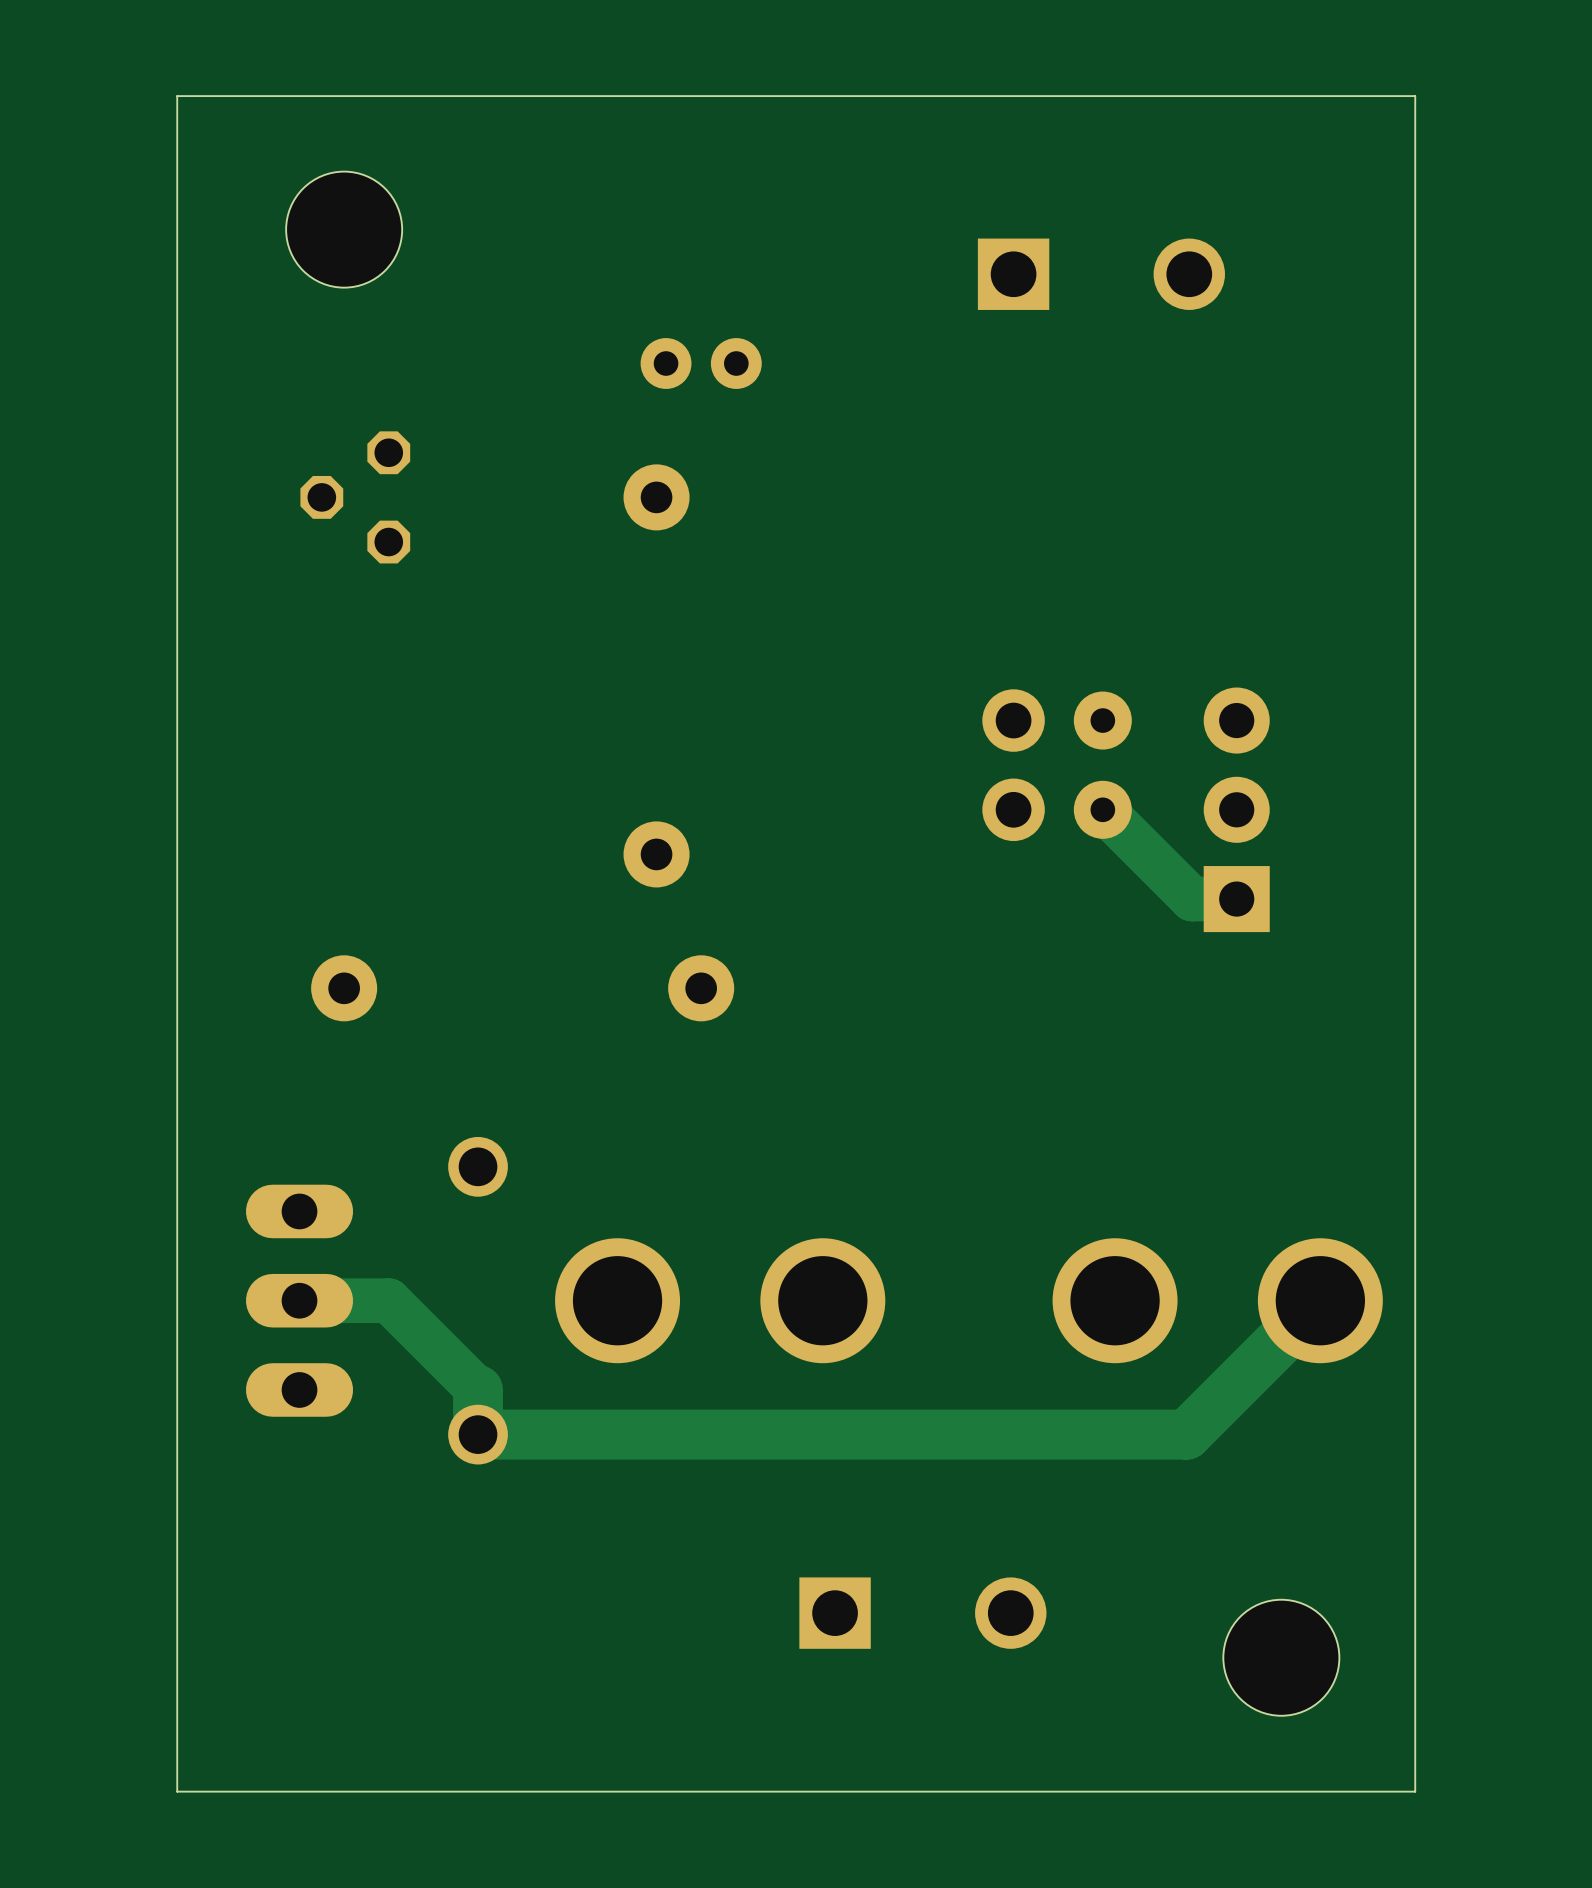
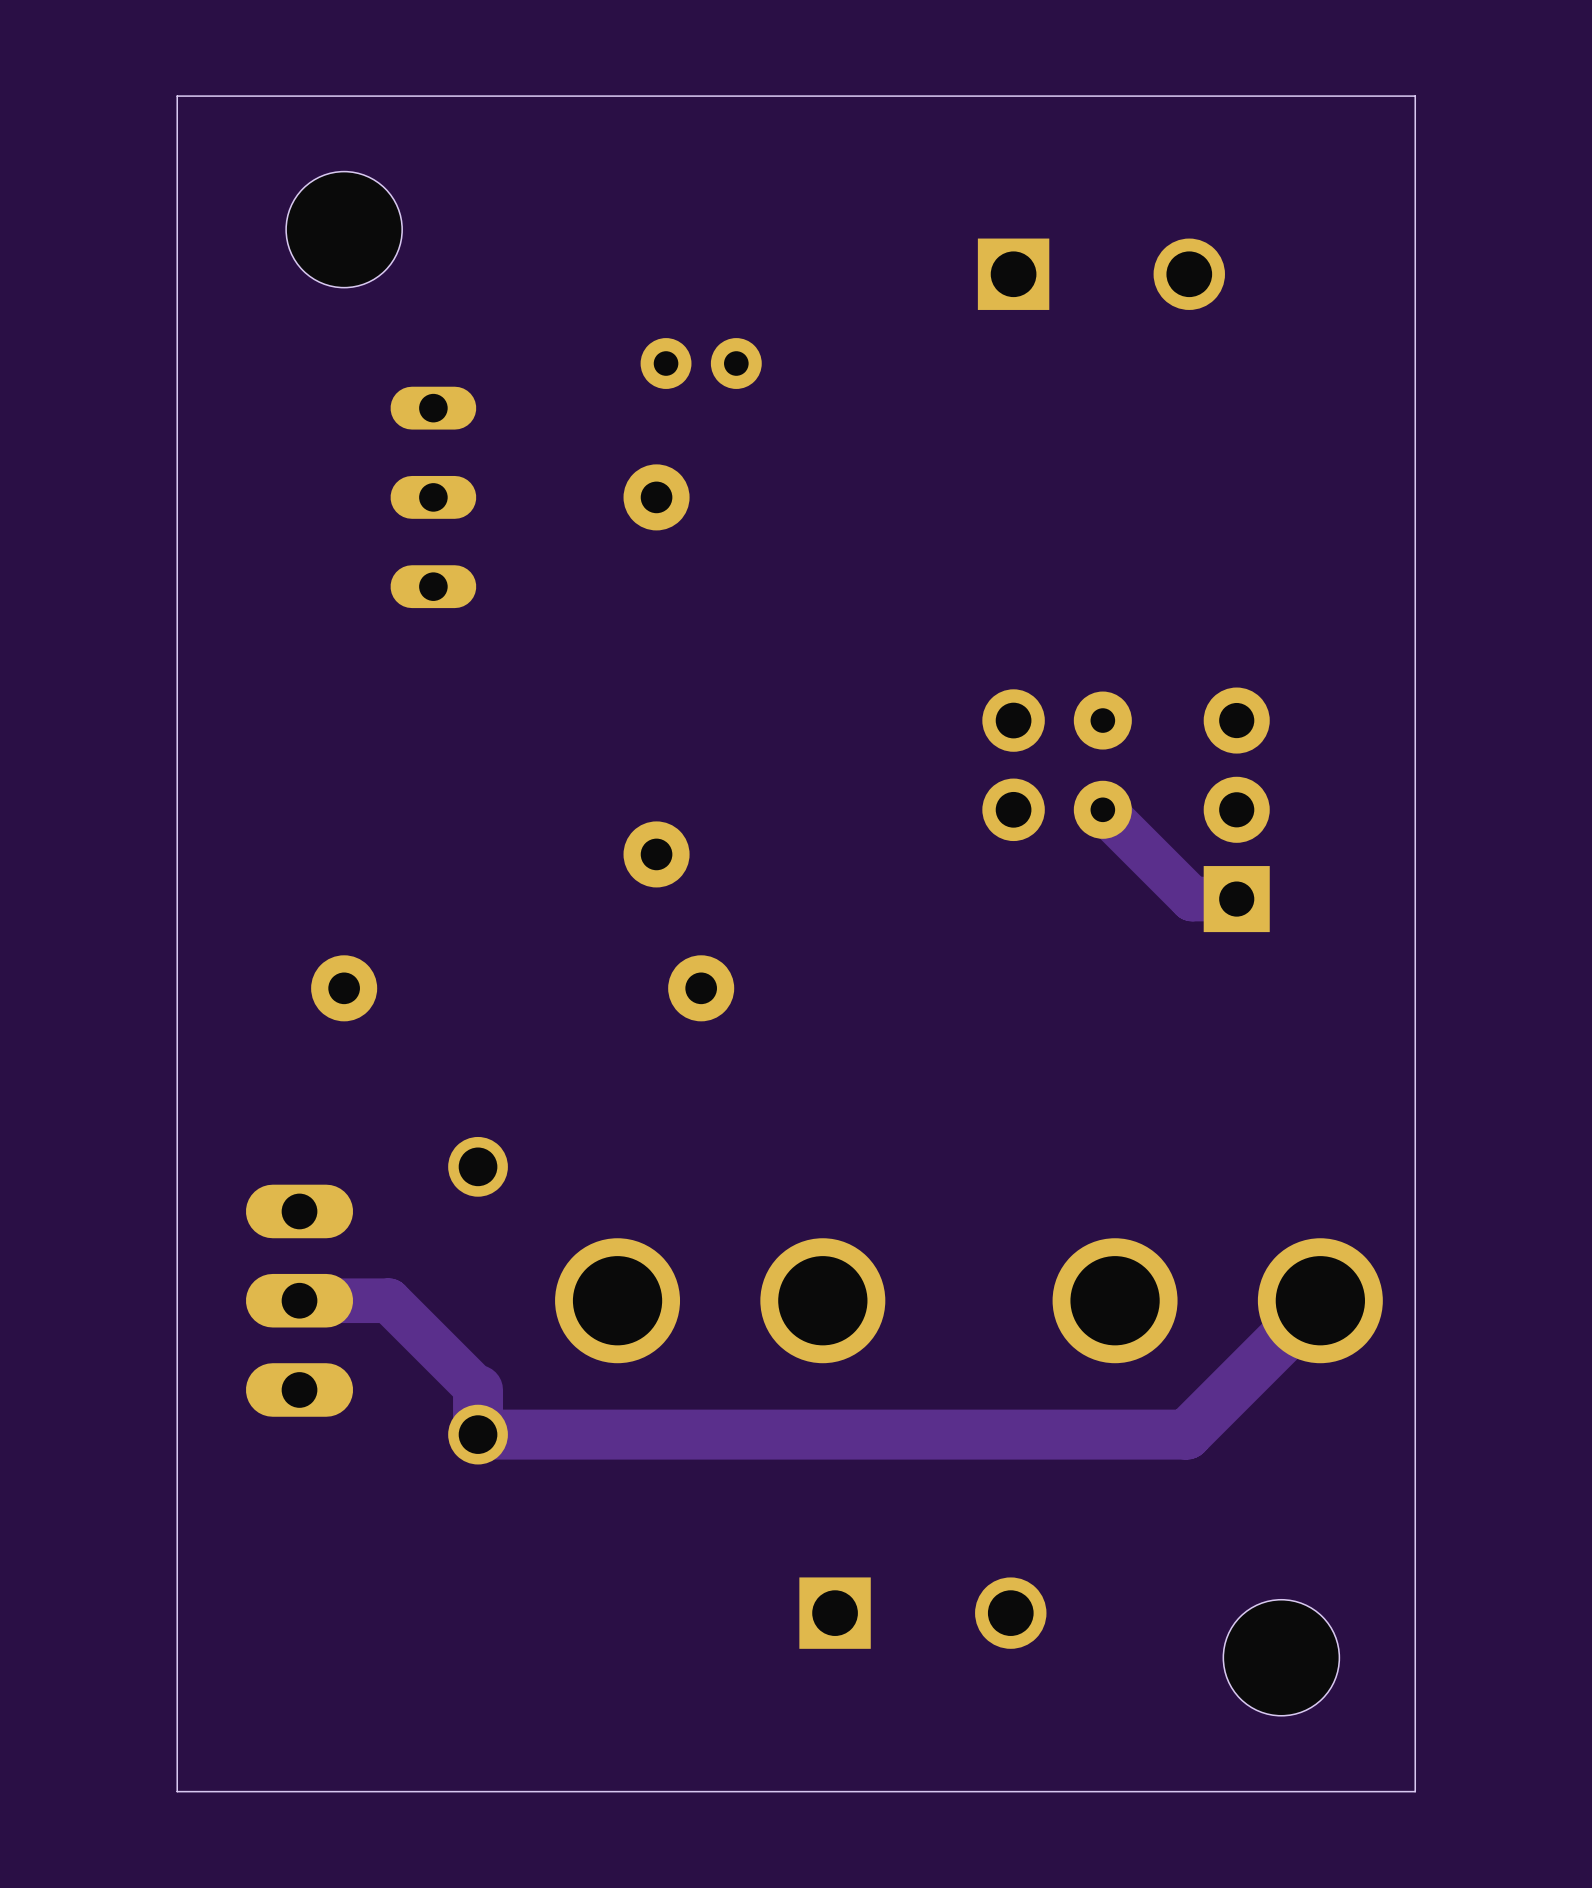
part: (355, 497) -> none
part: none -> (433, 497)

